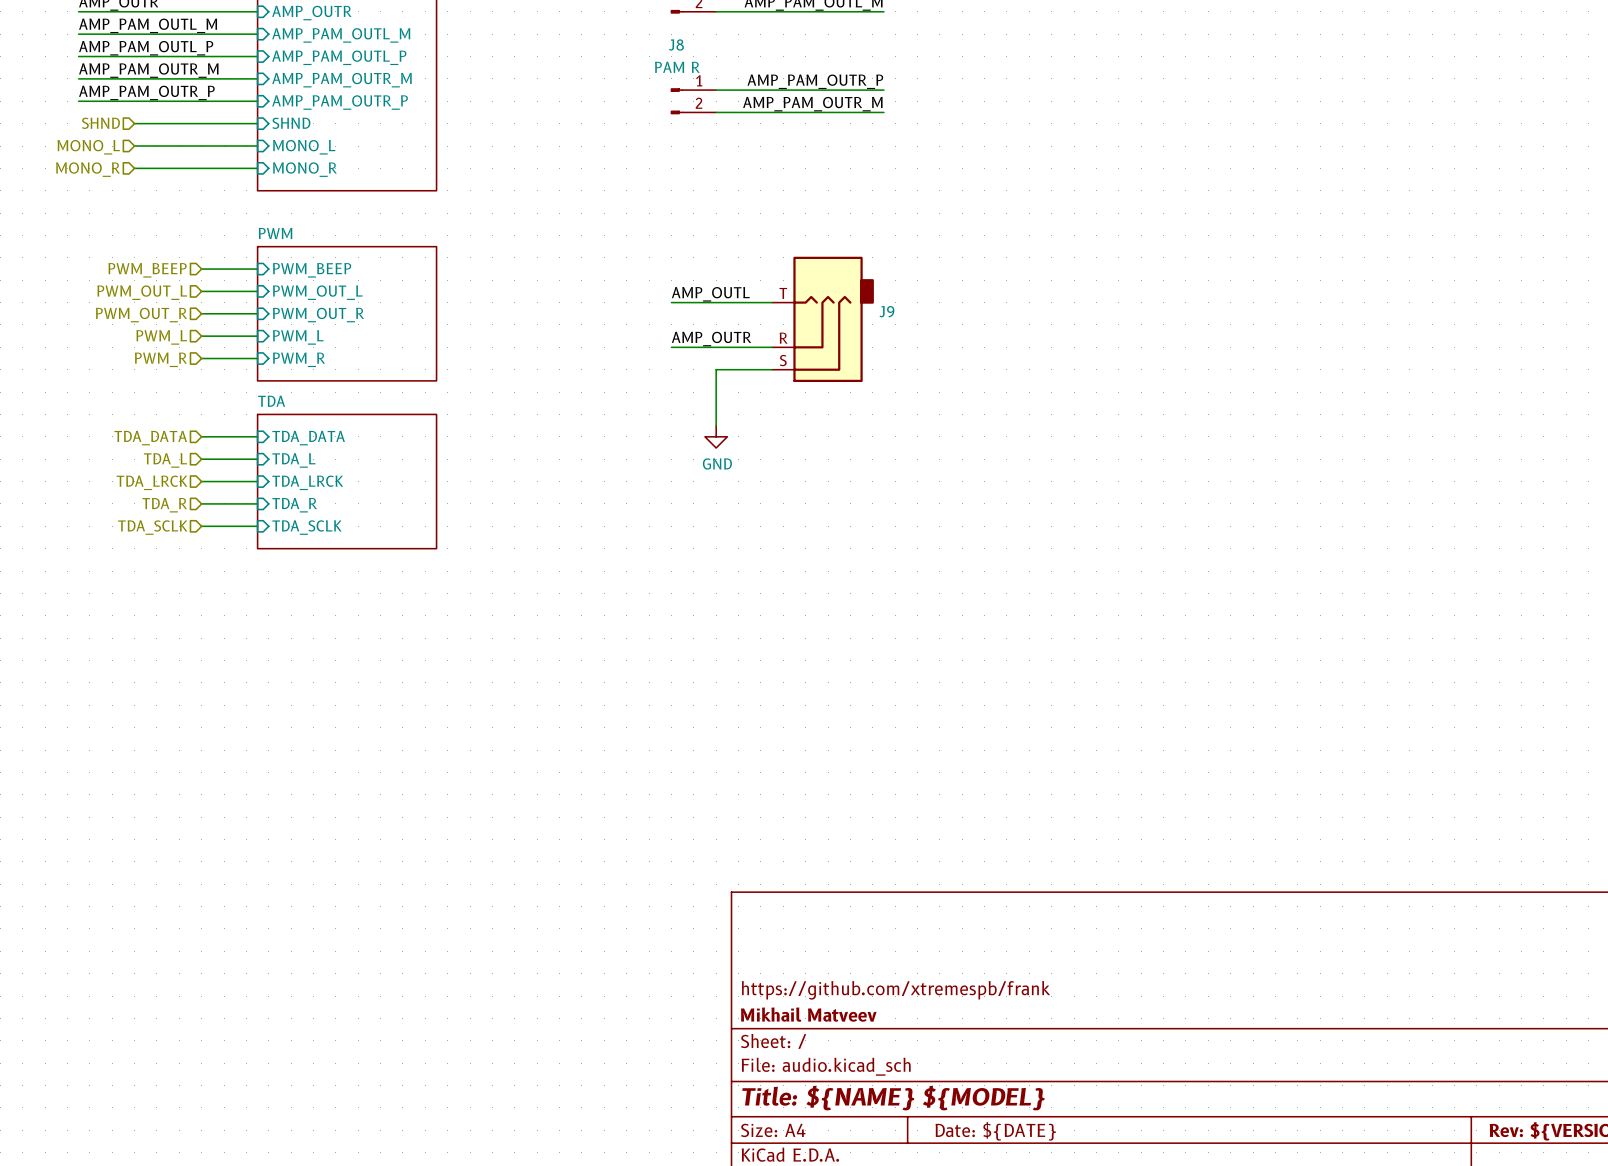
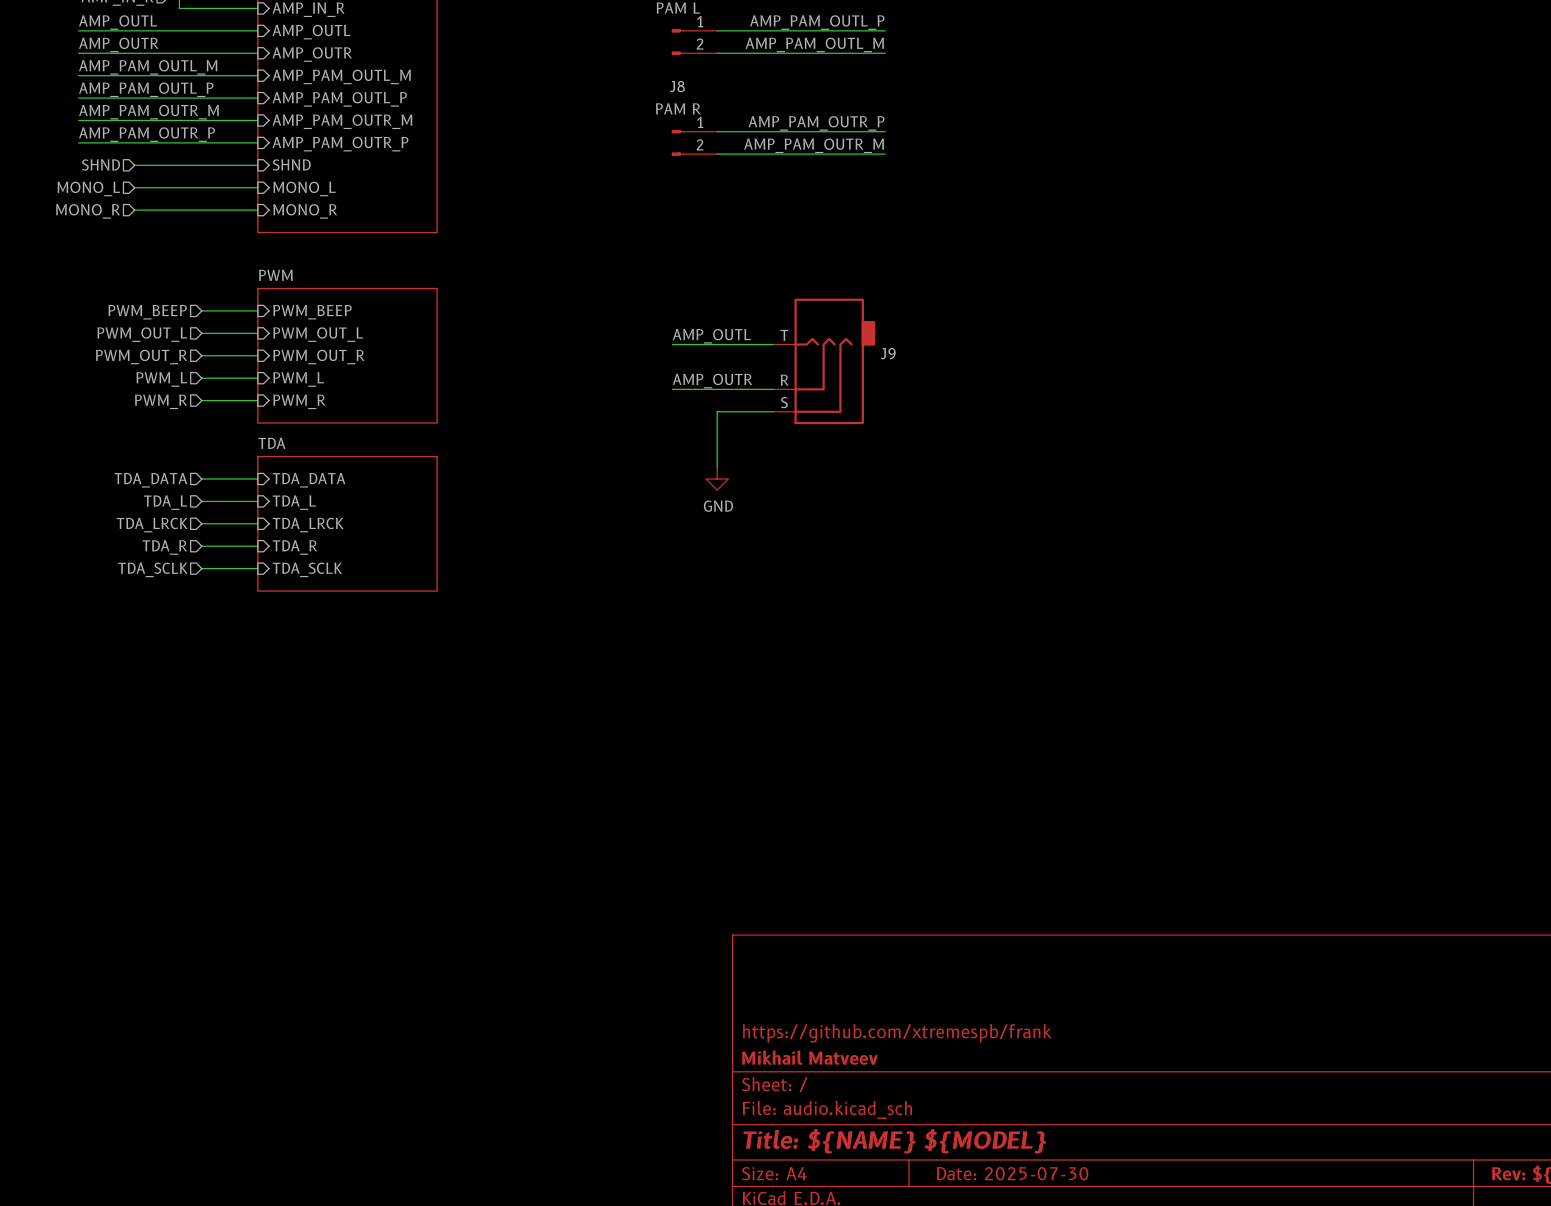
title block: Date: ${DATE} (995, 1131) -> Date: 2025-07-30 (1012, 1173)

